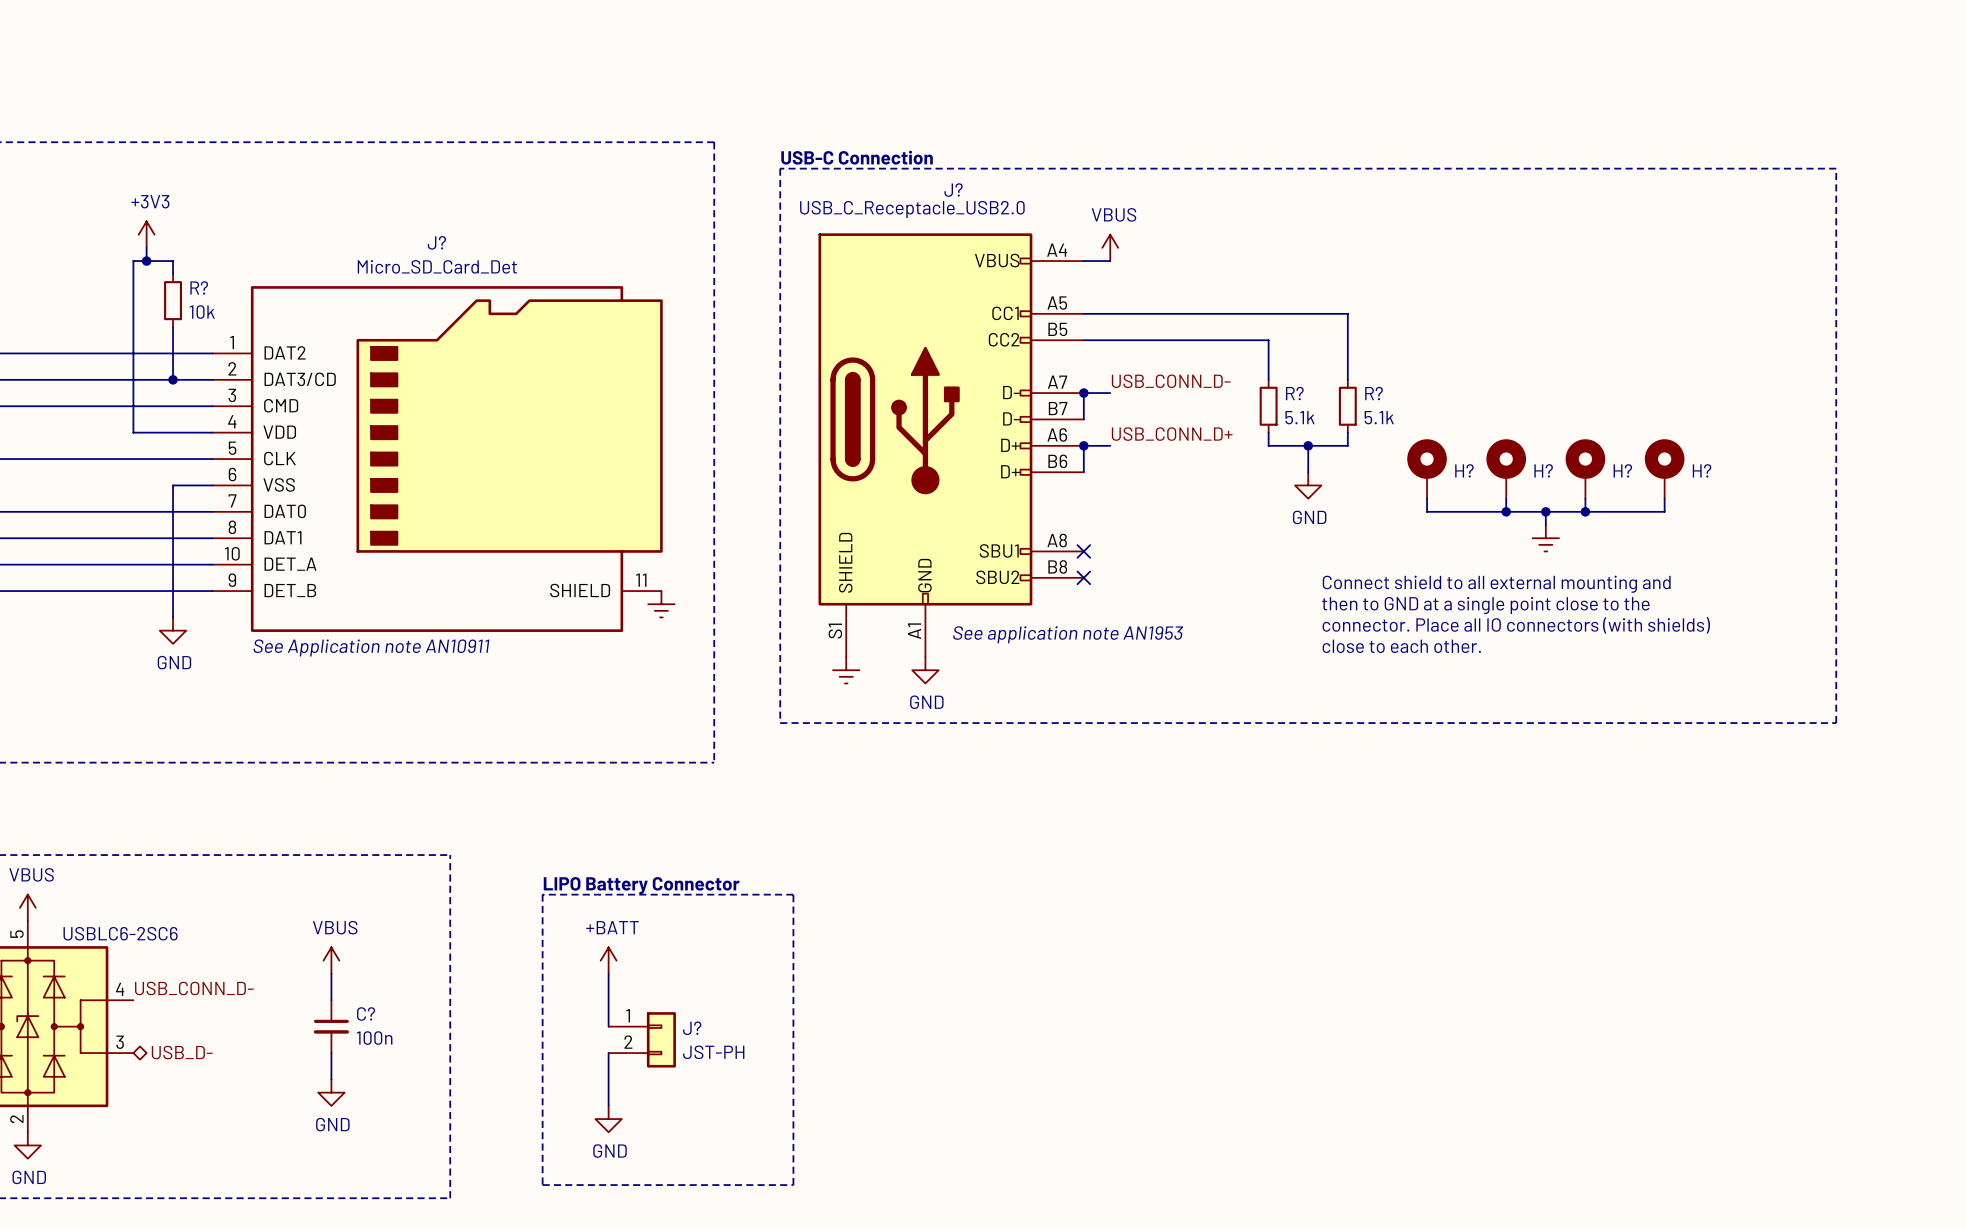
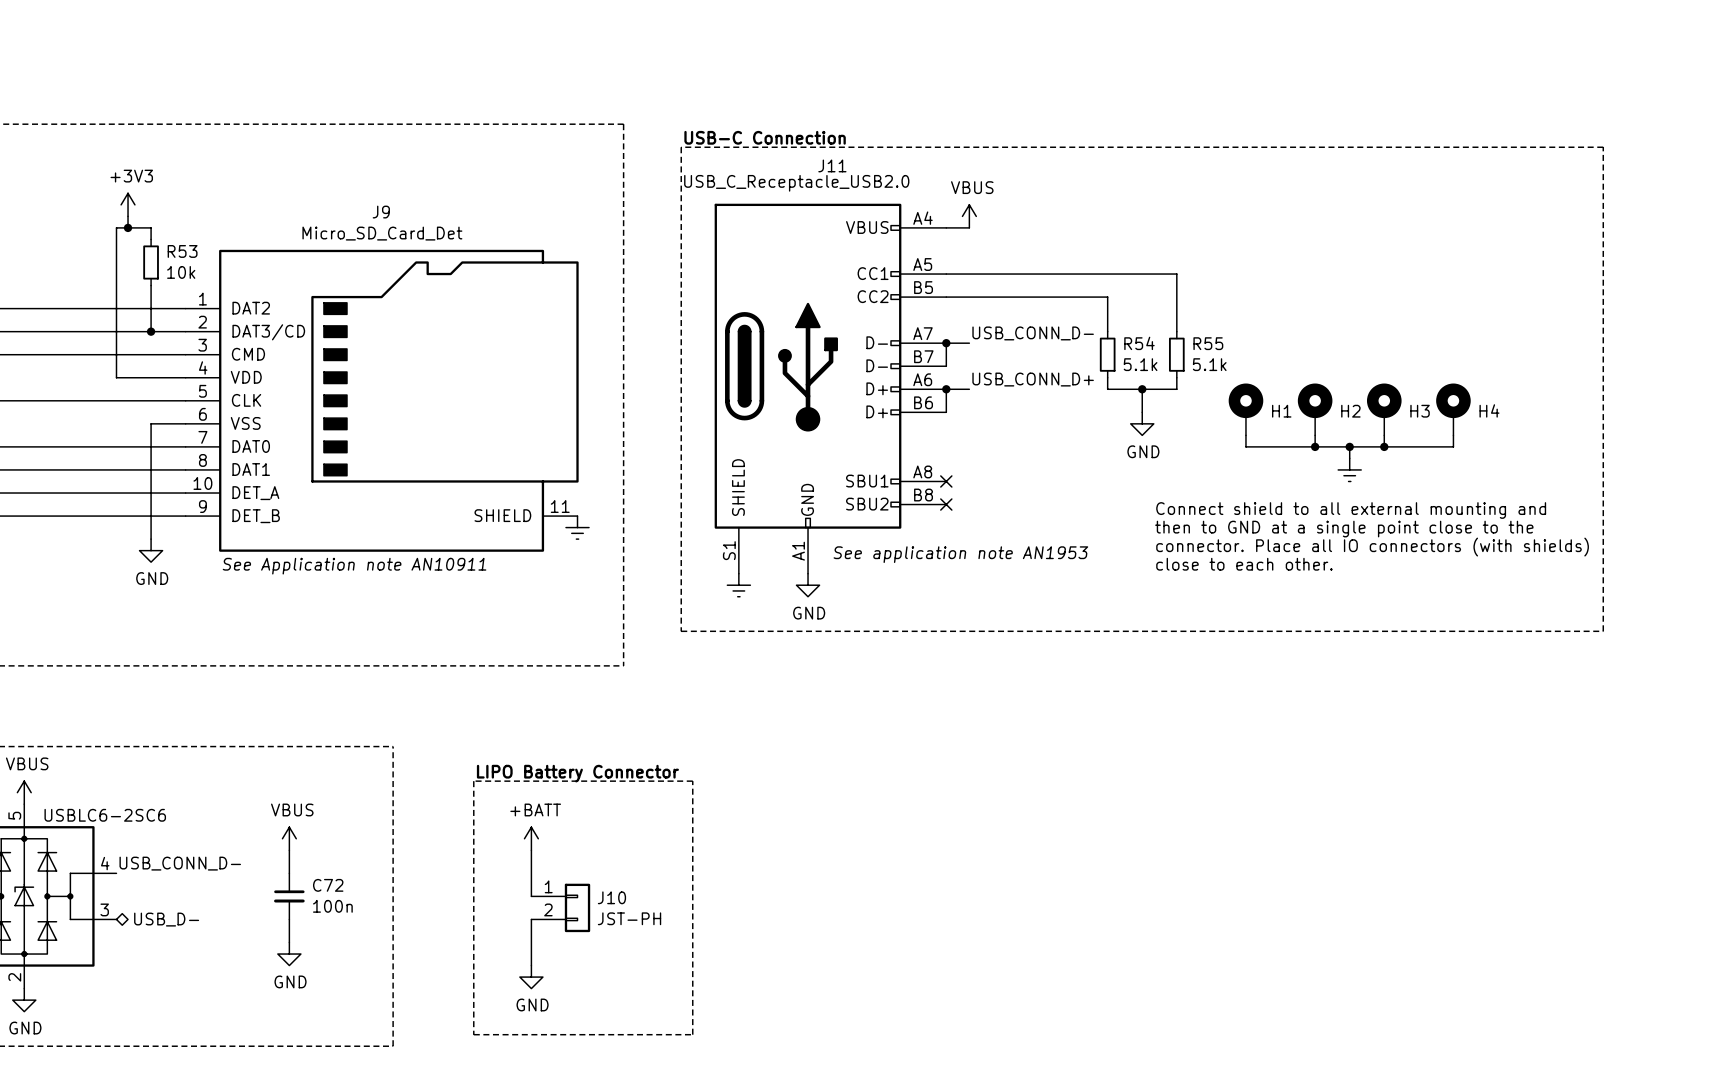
J? name: J? (953, 190) -> J11 (832, 165)
J? name: J? (436, 242) -> J9 (381, 212)
R? name: R? (199, 287) -> R53 (182, 251)
R? name: R? (1294, 393) -> R54 (1139, 343)
R? name: R? (1374, 393) -> R55 (1208, 343)
H? name: H? (1464, 470) -> H1 (1281, 411)
H? name: H? (1543, 470) -> H2 (1350, 411)
H? name: H? (1622, 470) -> H3 (1420, 411)
H? name: H? (1702, 470) -> H4 (1489, 410)
C? name: C? (366, 1014) -> C72 (328, 885)
J? name: J? (692, 1028) -> J10 (611, 897)

